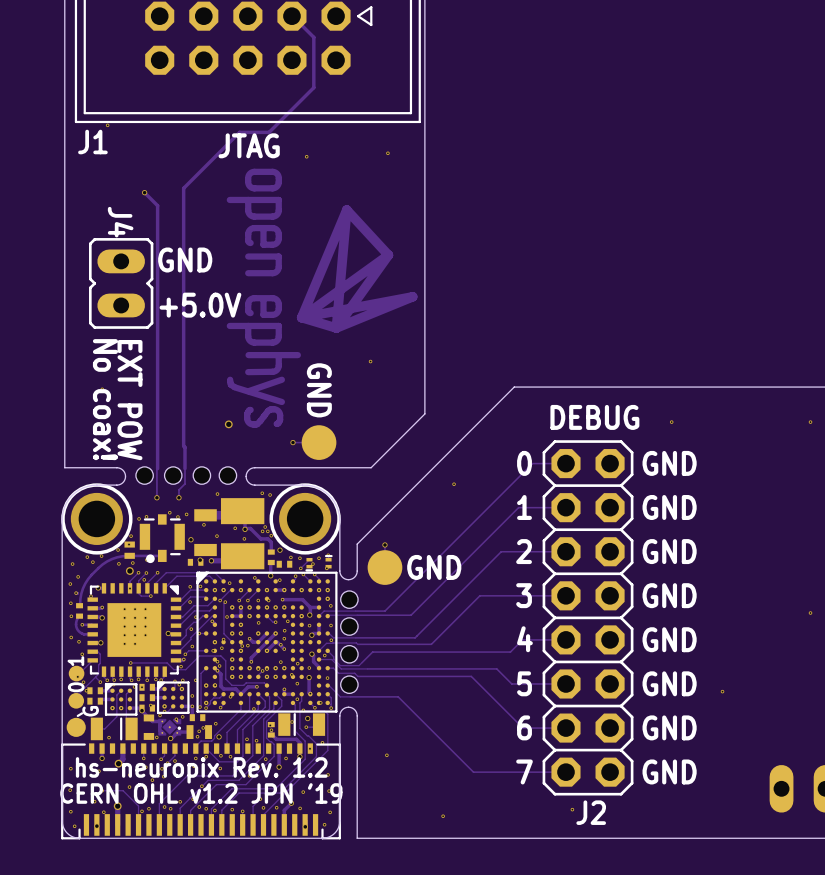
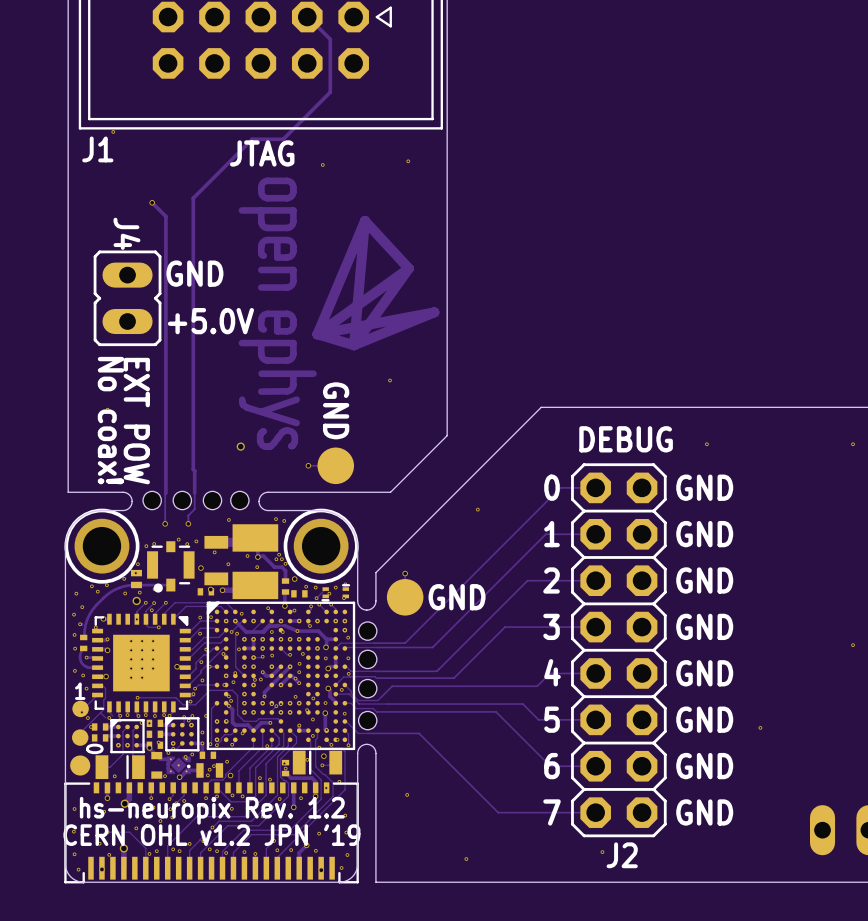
track: none -> (235, 621) (246, 632) (263, 632) (269, 625)
track: none -> (308, 621) (310, 625)
track: none -> (269, 626) (284, 625) (297, 631)
via: none -> (310, 625)
via: (239, 600) -> none
via: (247, 600) -> none
track: none -> (262, 656) (253, 657)
via: none -> (262, 656)
text rotation: 0° (75, 661) -> 90° clockwise (80, 691)
via: (107, 680) -> none
via: (100, 682) -> none
via: none -> (109, 717)
text: 0 (76, 687) -> none
text: G (90, 711) -> 0 (94, 748)
line: (82, 713) (77, 715) -> none

